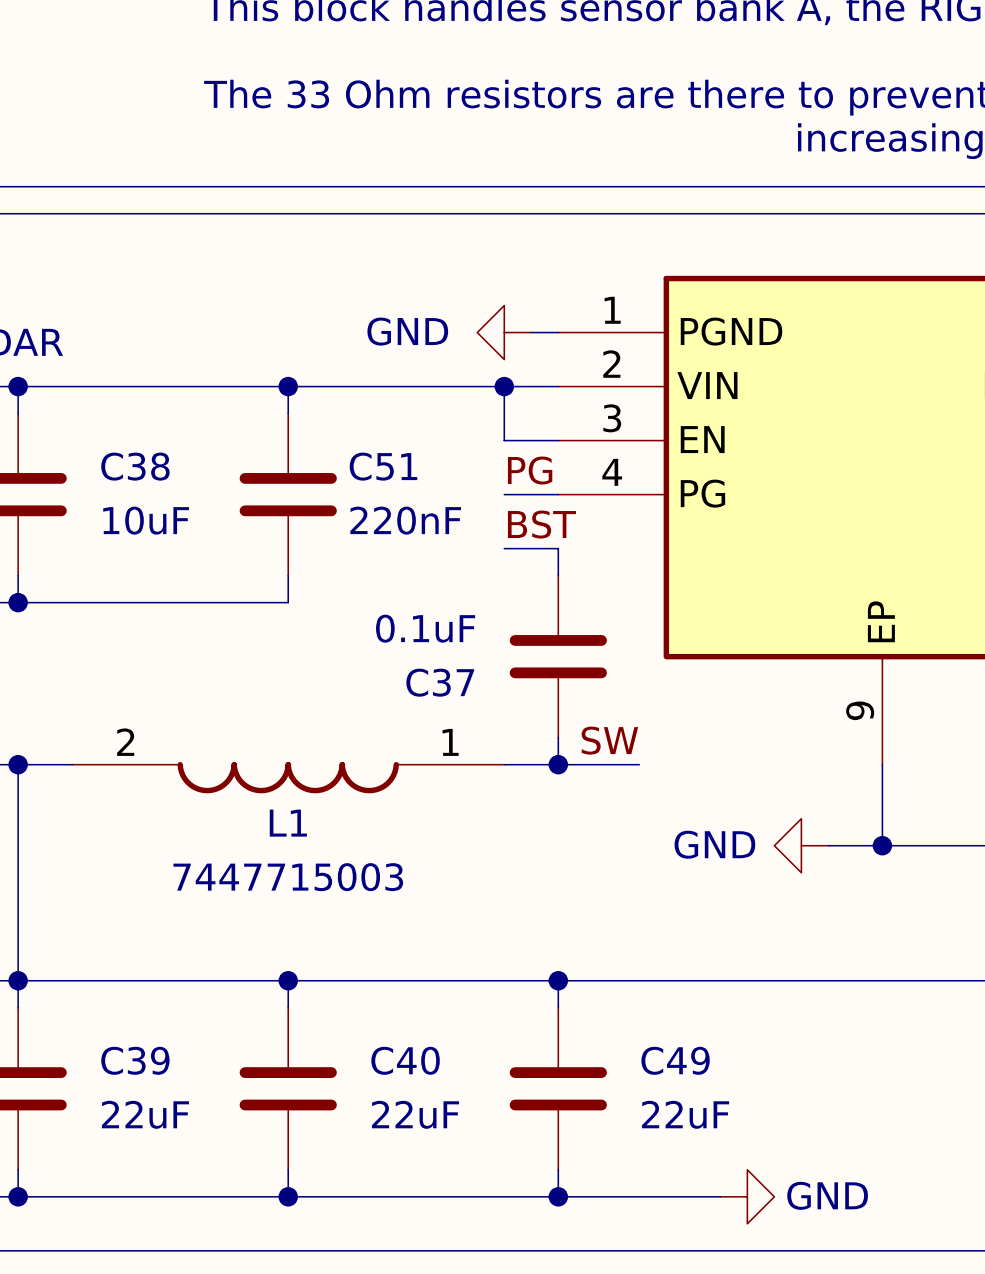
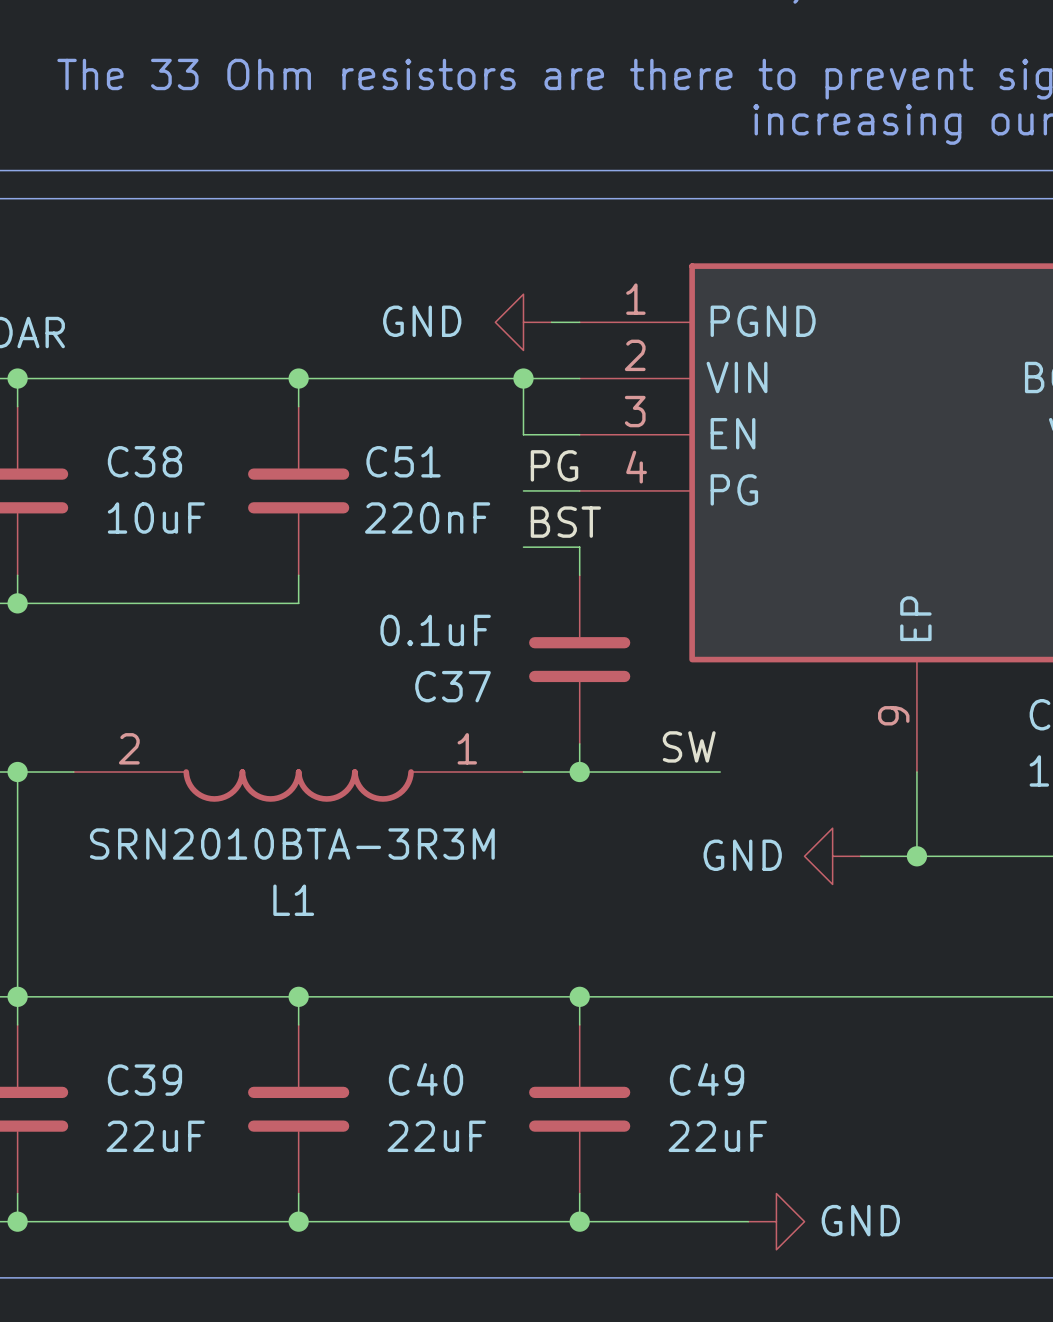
label position: SW (609, 740) -> SW (689, 746)
wire: none -> (664, 772) (720, 772)
L1 name position: L1 (288, 823) -> L1 (293, 900)
L1 value: 7447715003 (288, 877) -> SRN2010BTA-3R3M (292, 844)

